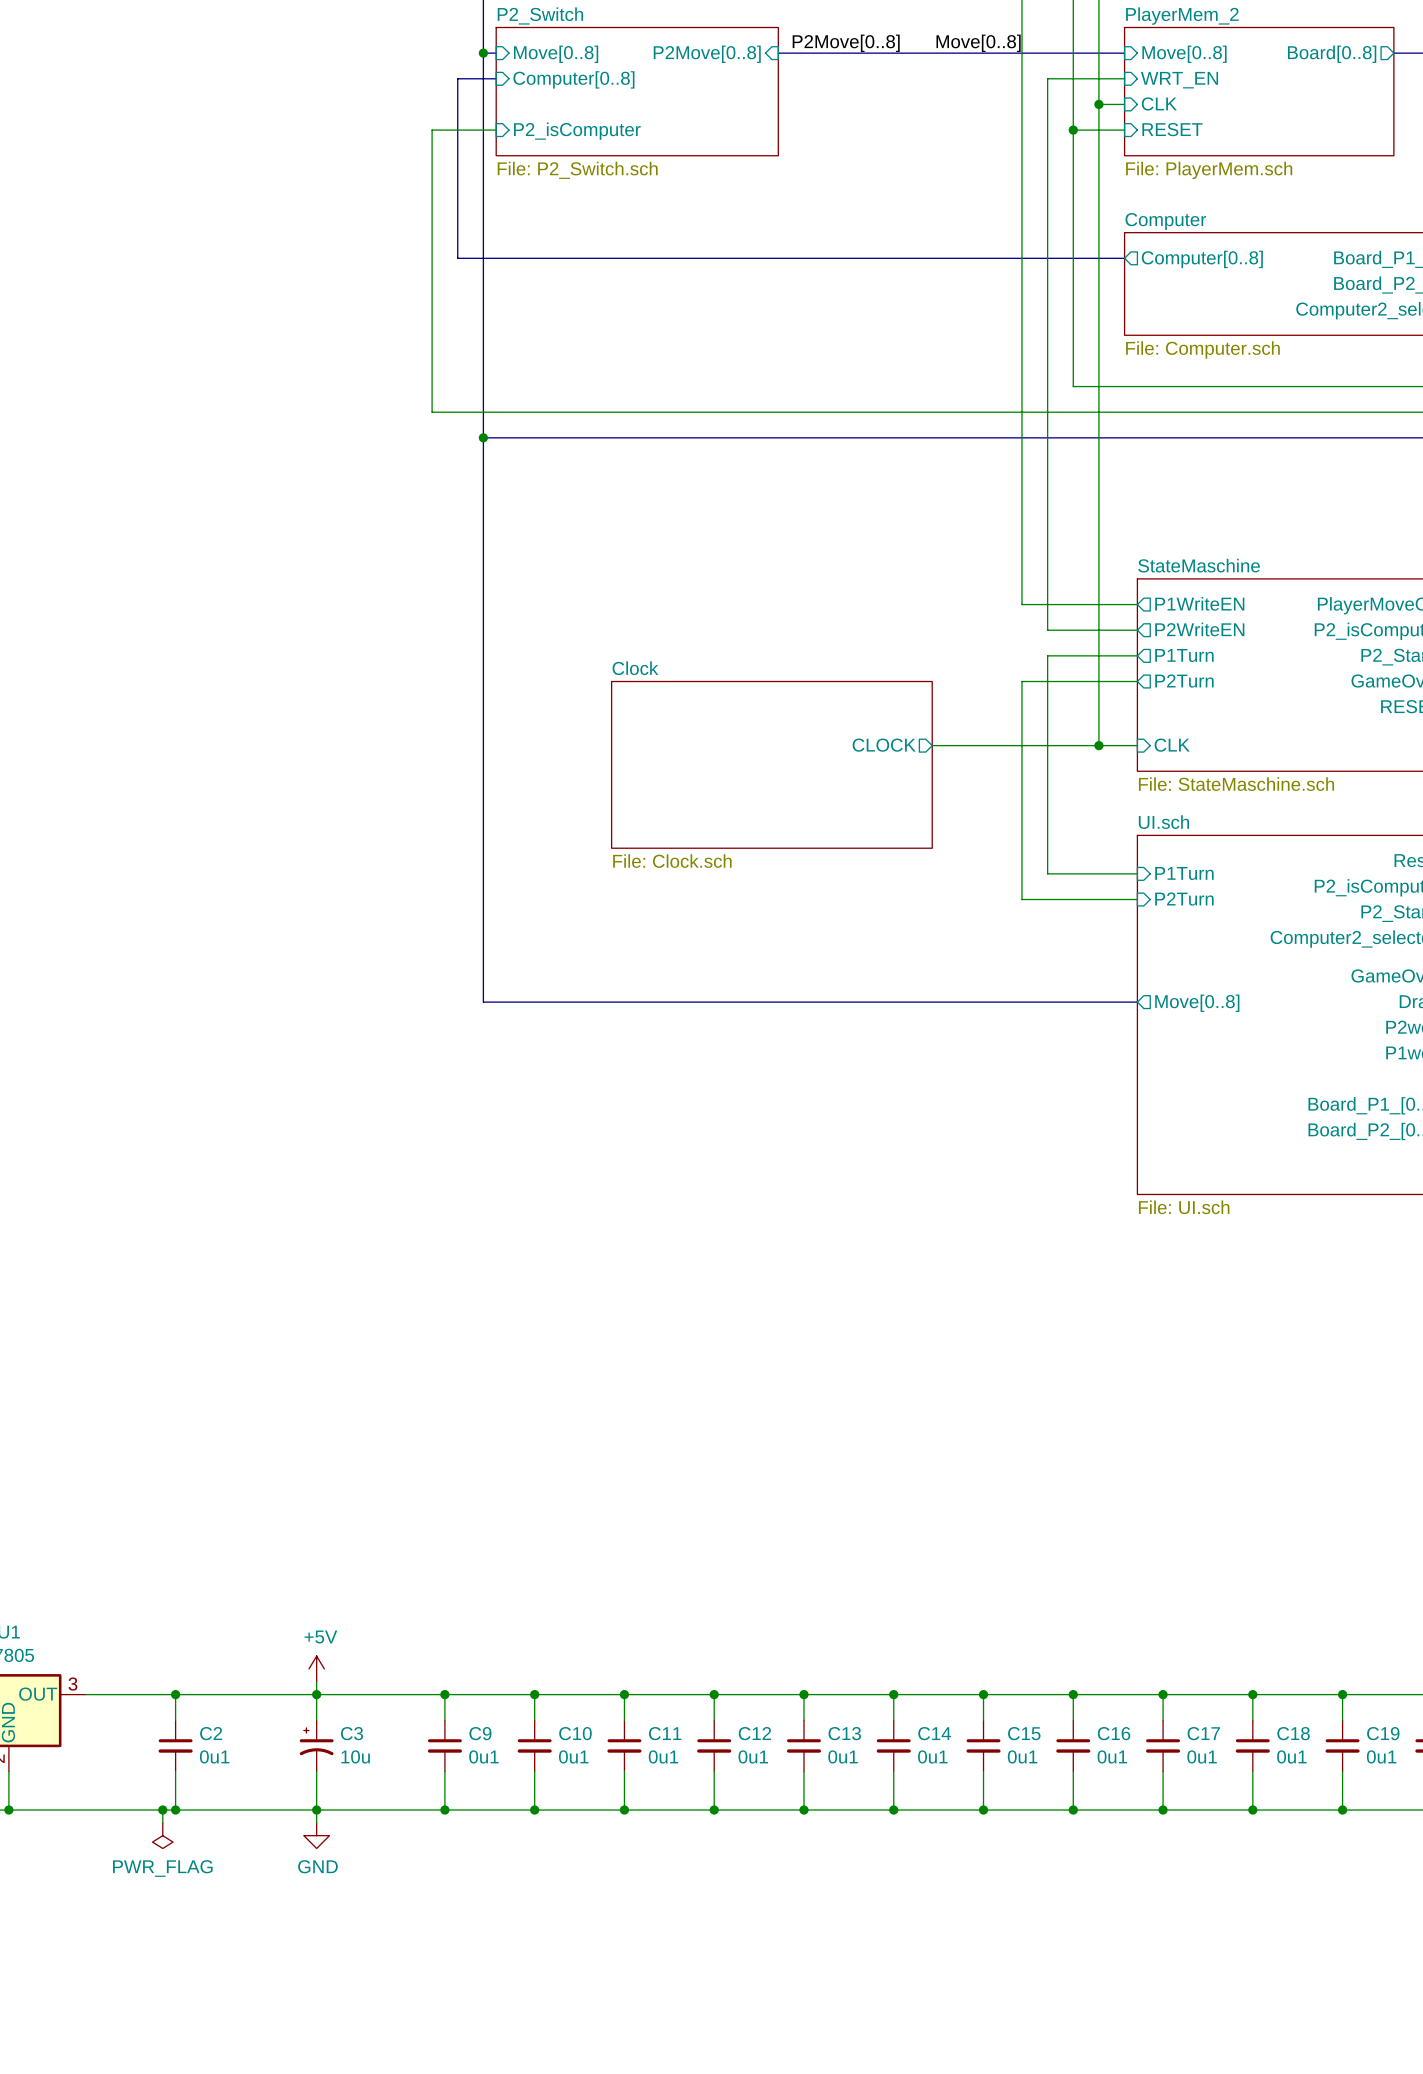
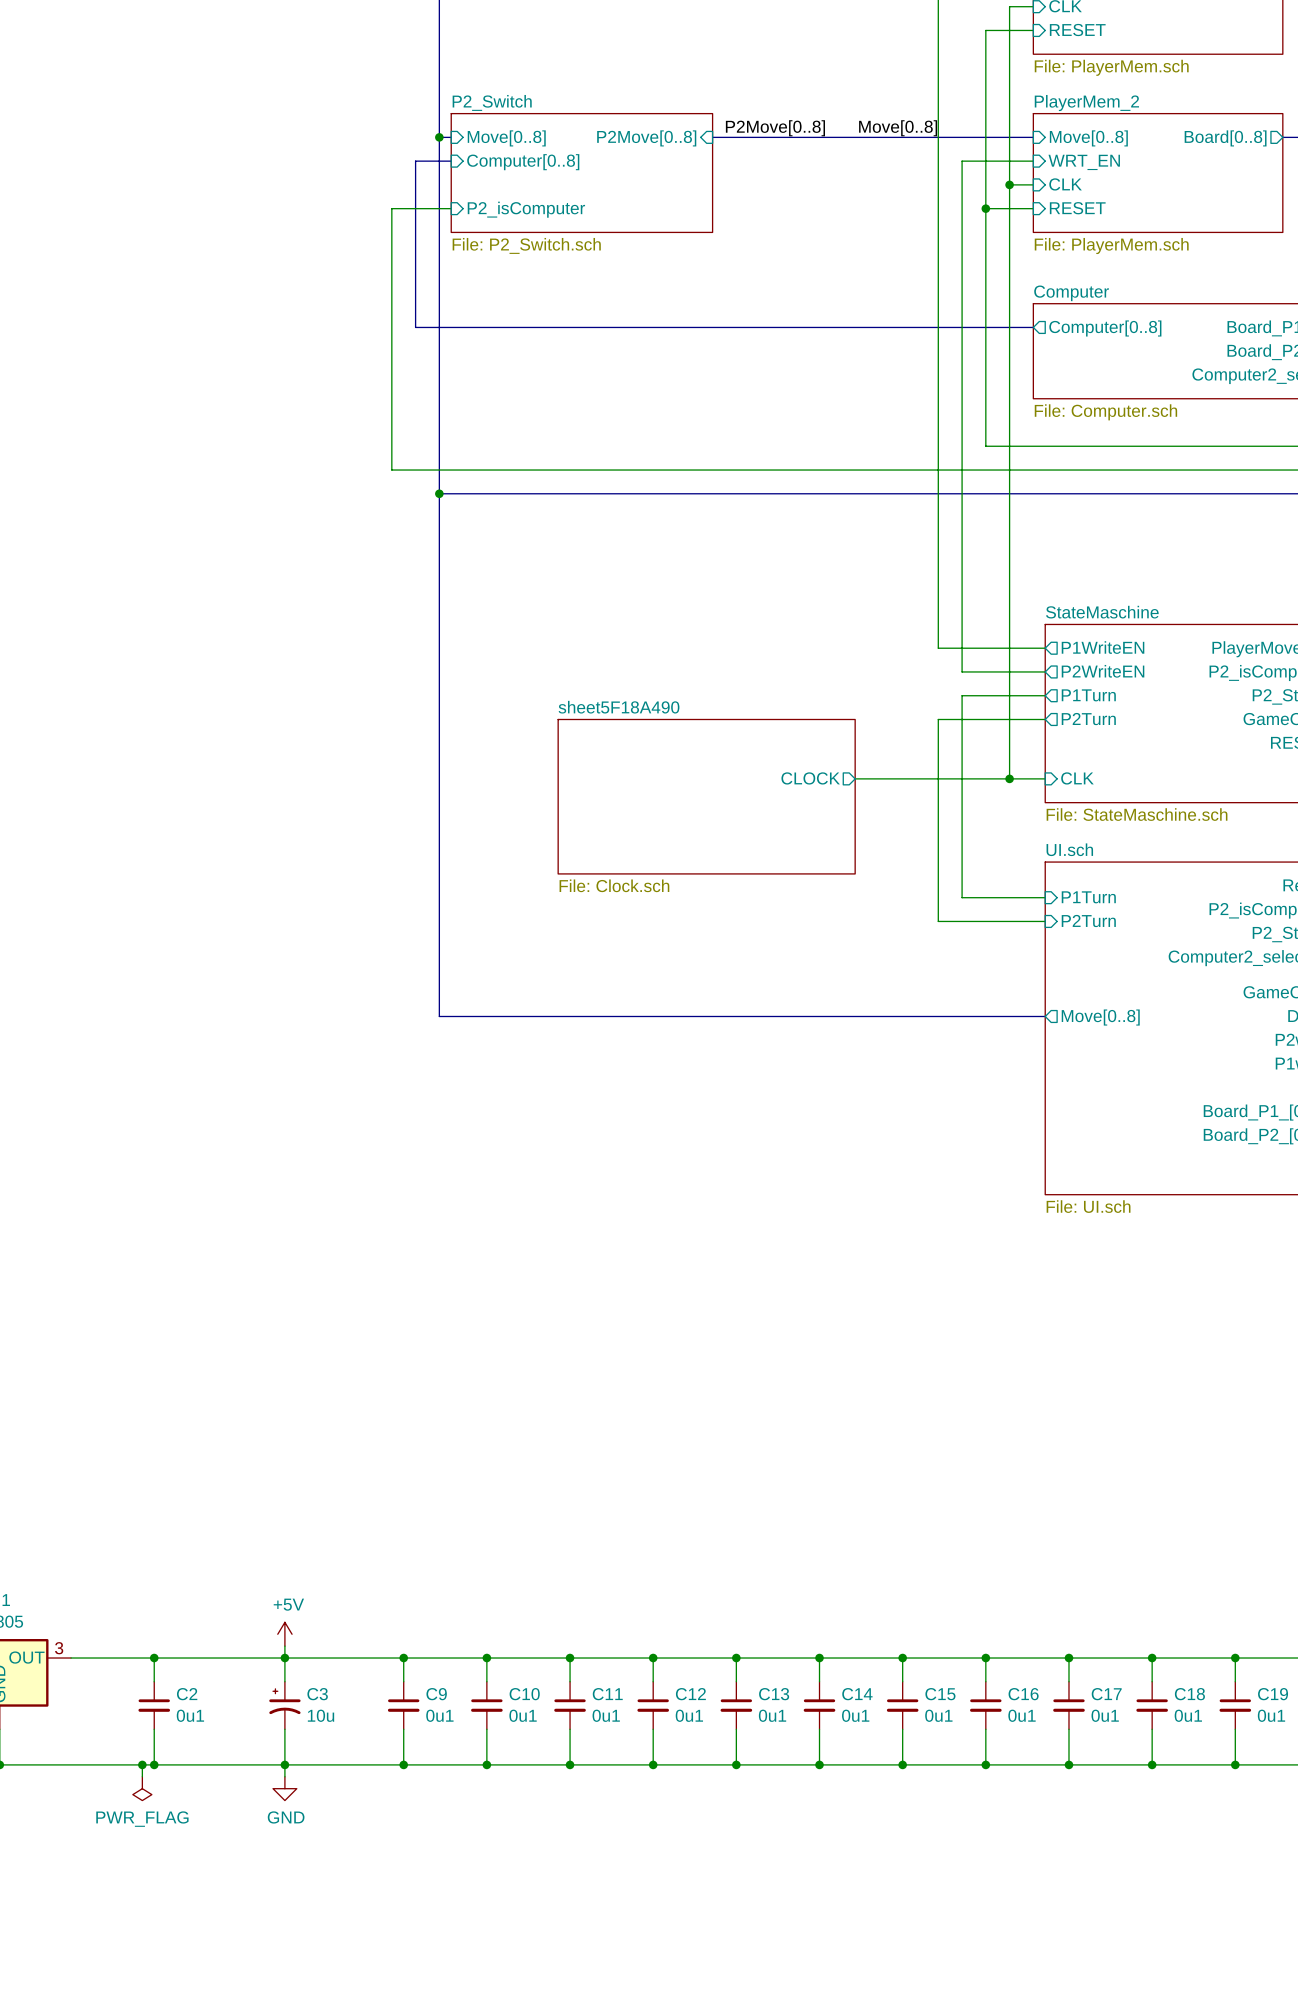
sheet Clock name: Clock (635, 668) -> sheet5F18A490 (619, 707)

